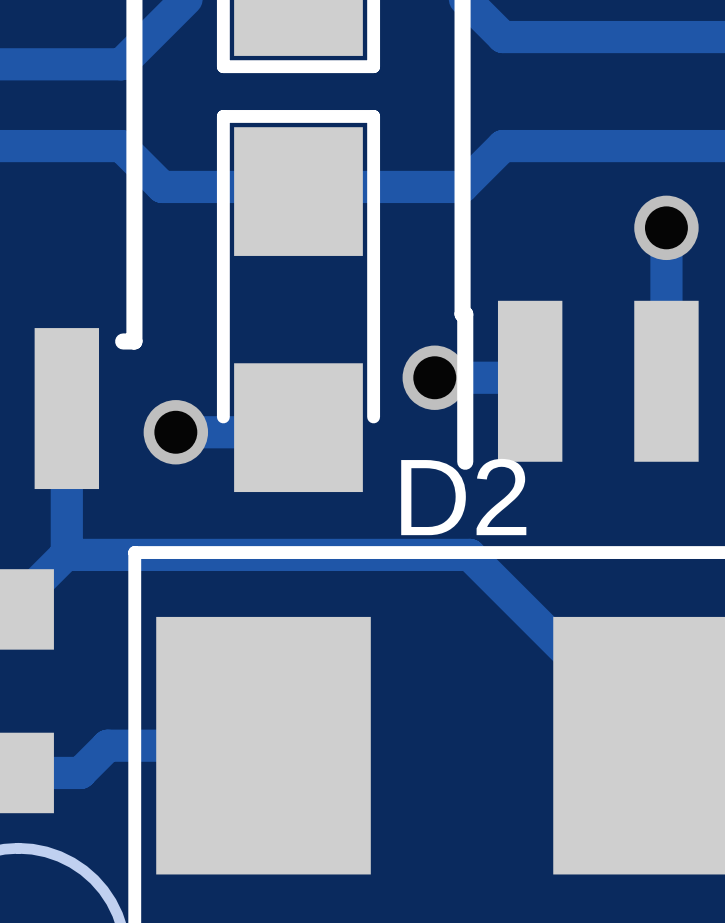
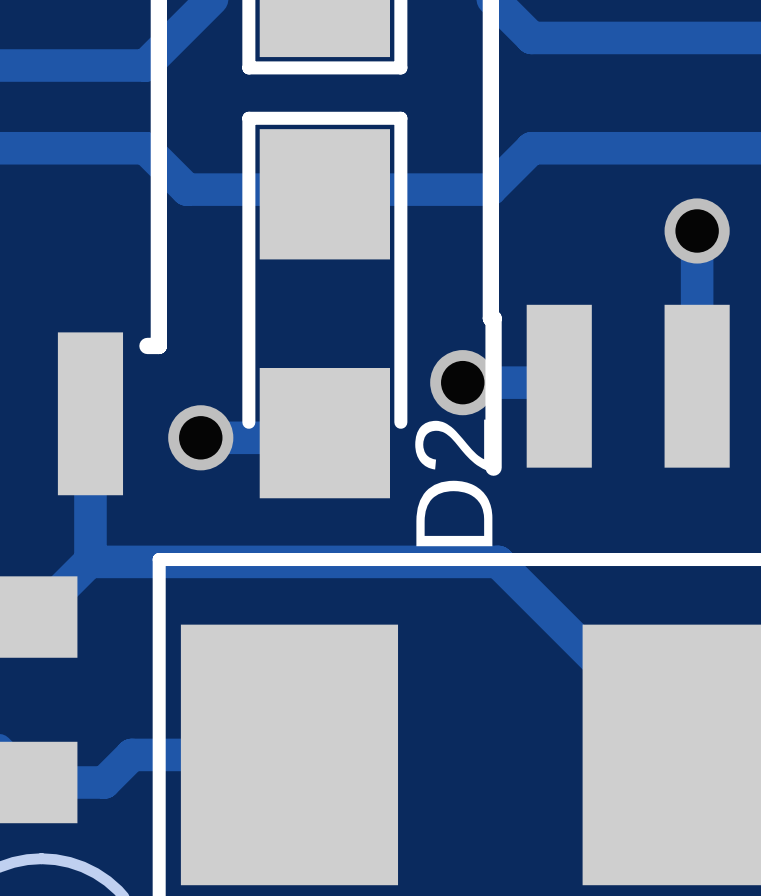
D2 name rotation: 0° (463, 497) -> 90° counterclockwise (453, 482)

